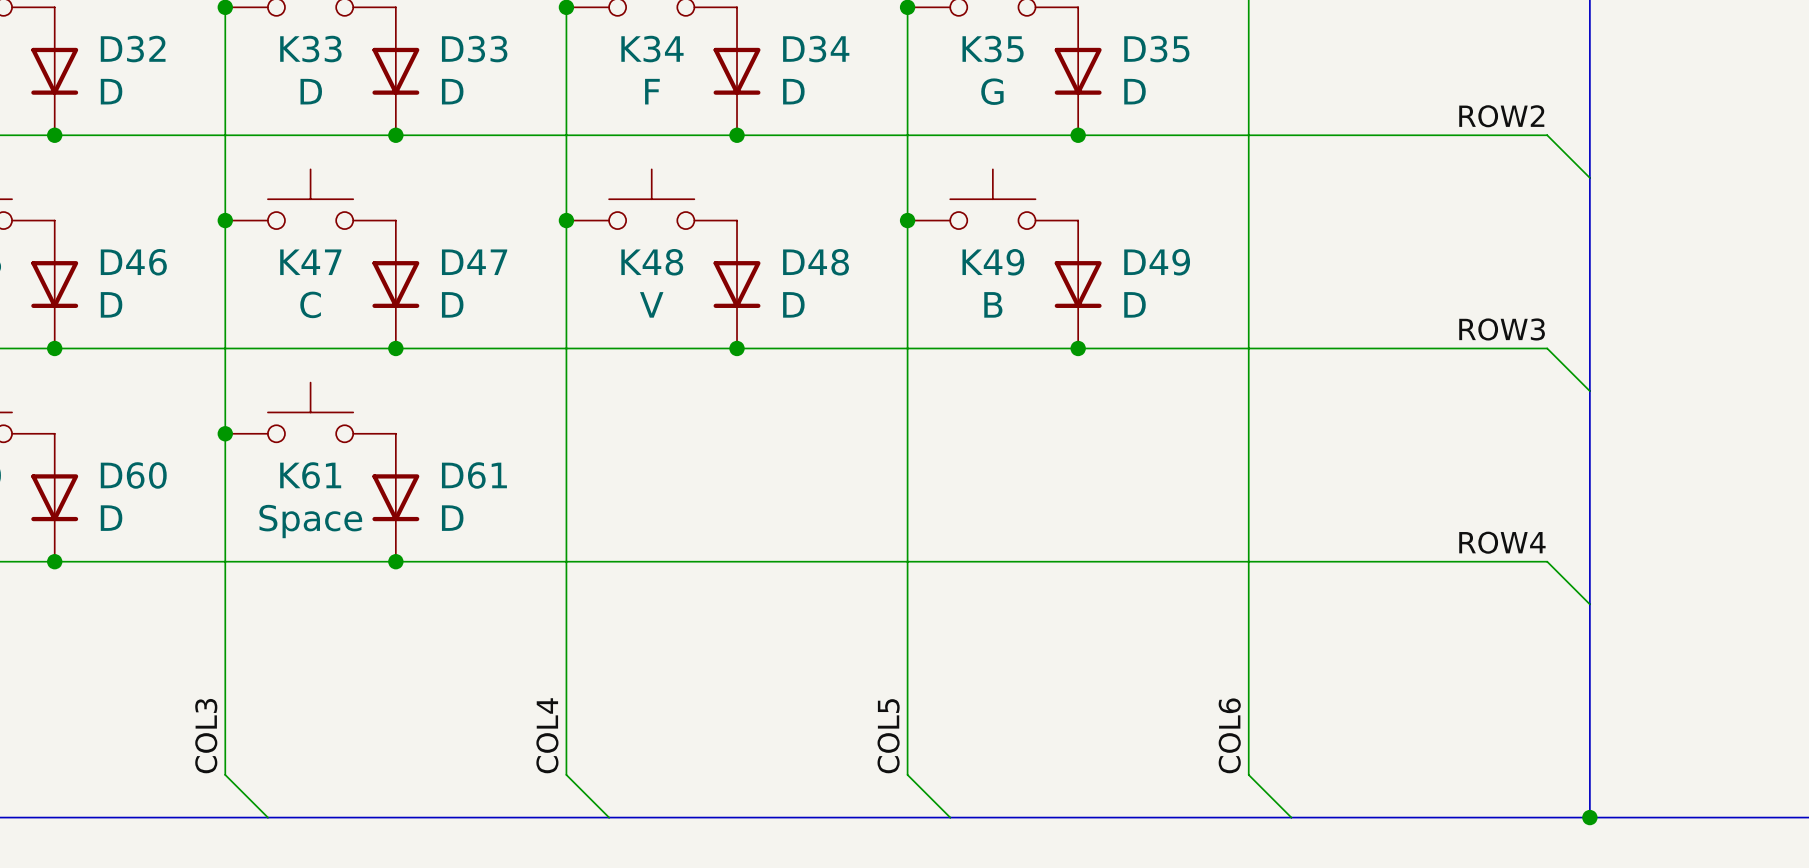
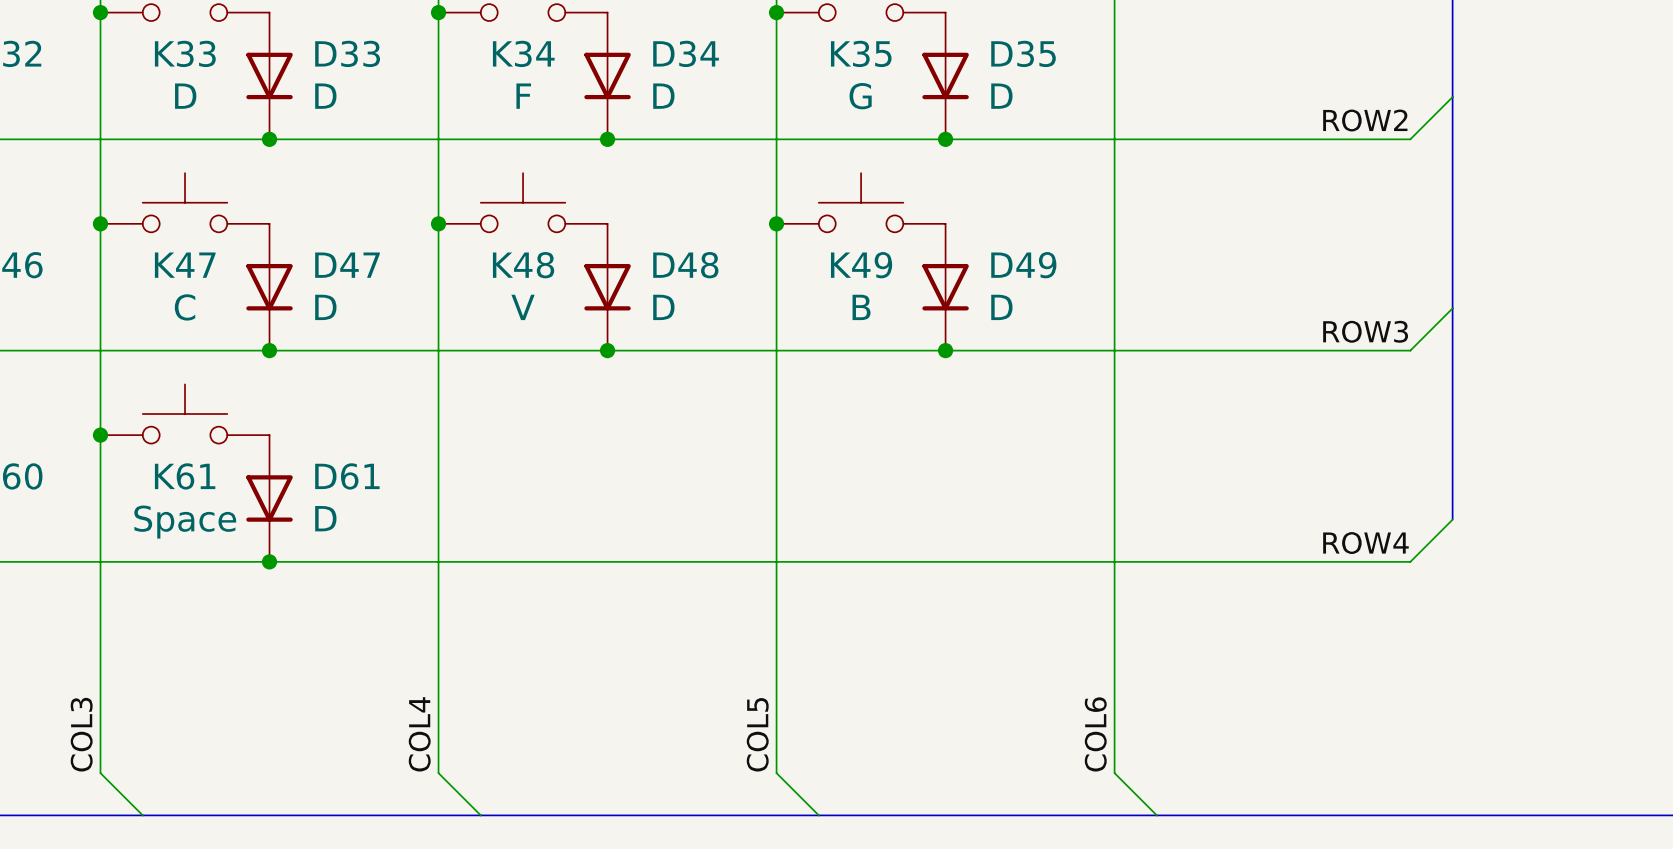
wire: (1547, 135) (1589, 177) -> (1410, 139) (1452, 97)
wire: (1547, 348) (1589, 391) -> (1410, 350) (1452, 308)
bus: (1589, 519) (1589, 817) -> none
wire: (1547, 561) (1589, 604) -> (1410, 561) (1452, 519)
junction: (1589, 817) -> none

